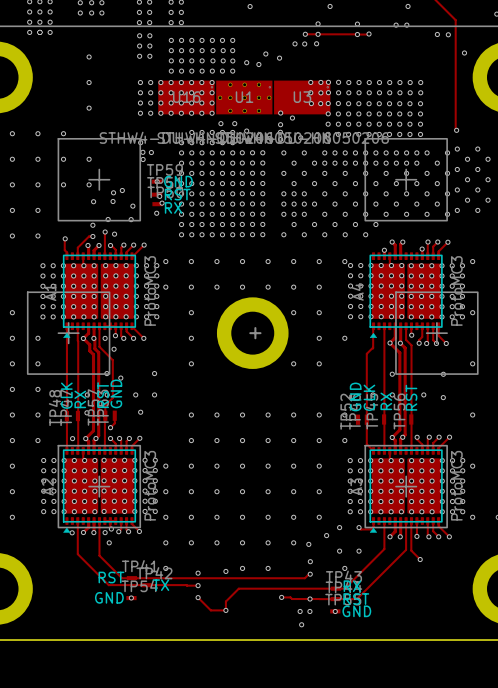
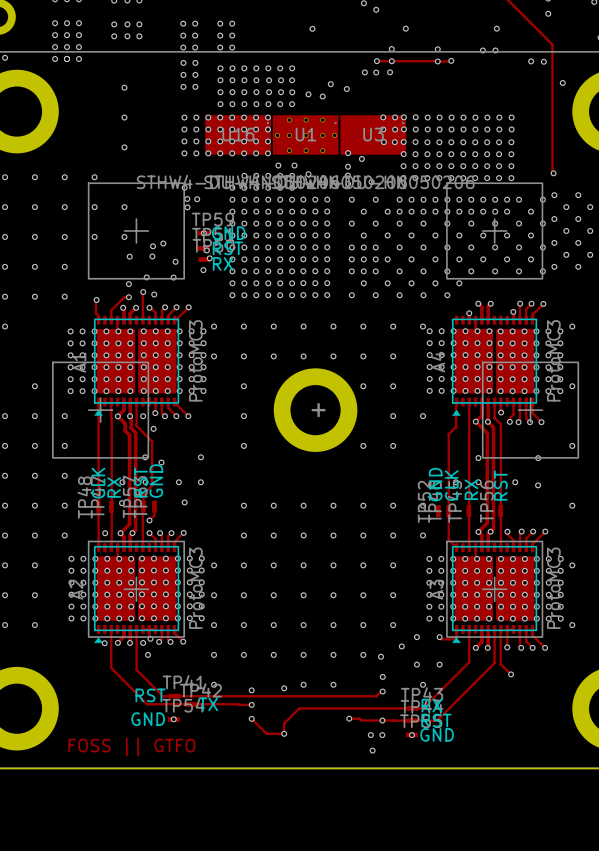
text: none -> FOSS || GTFO (131, 746)

